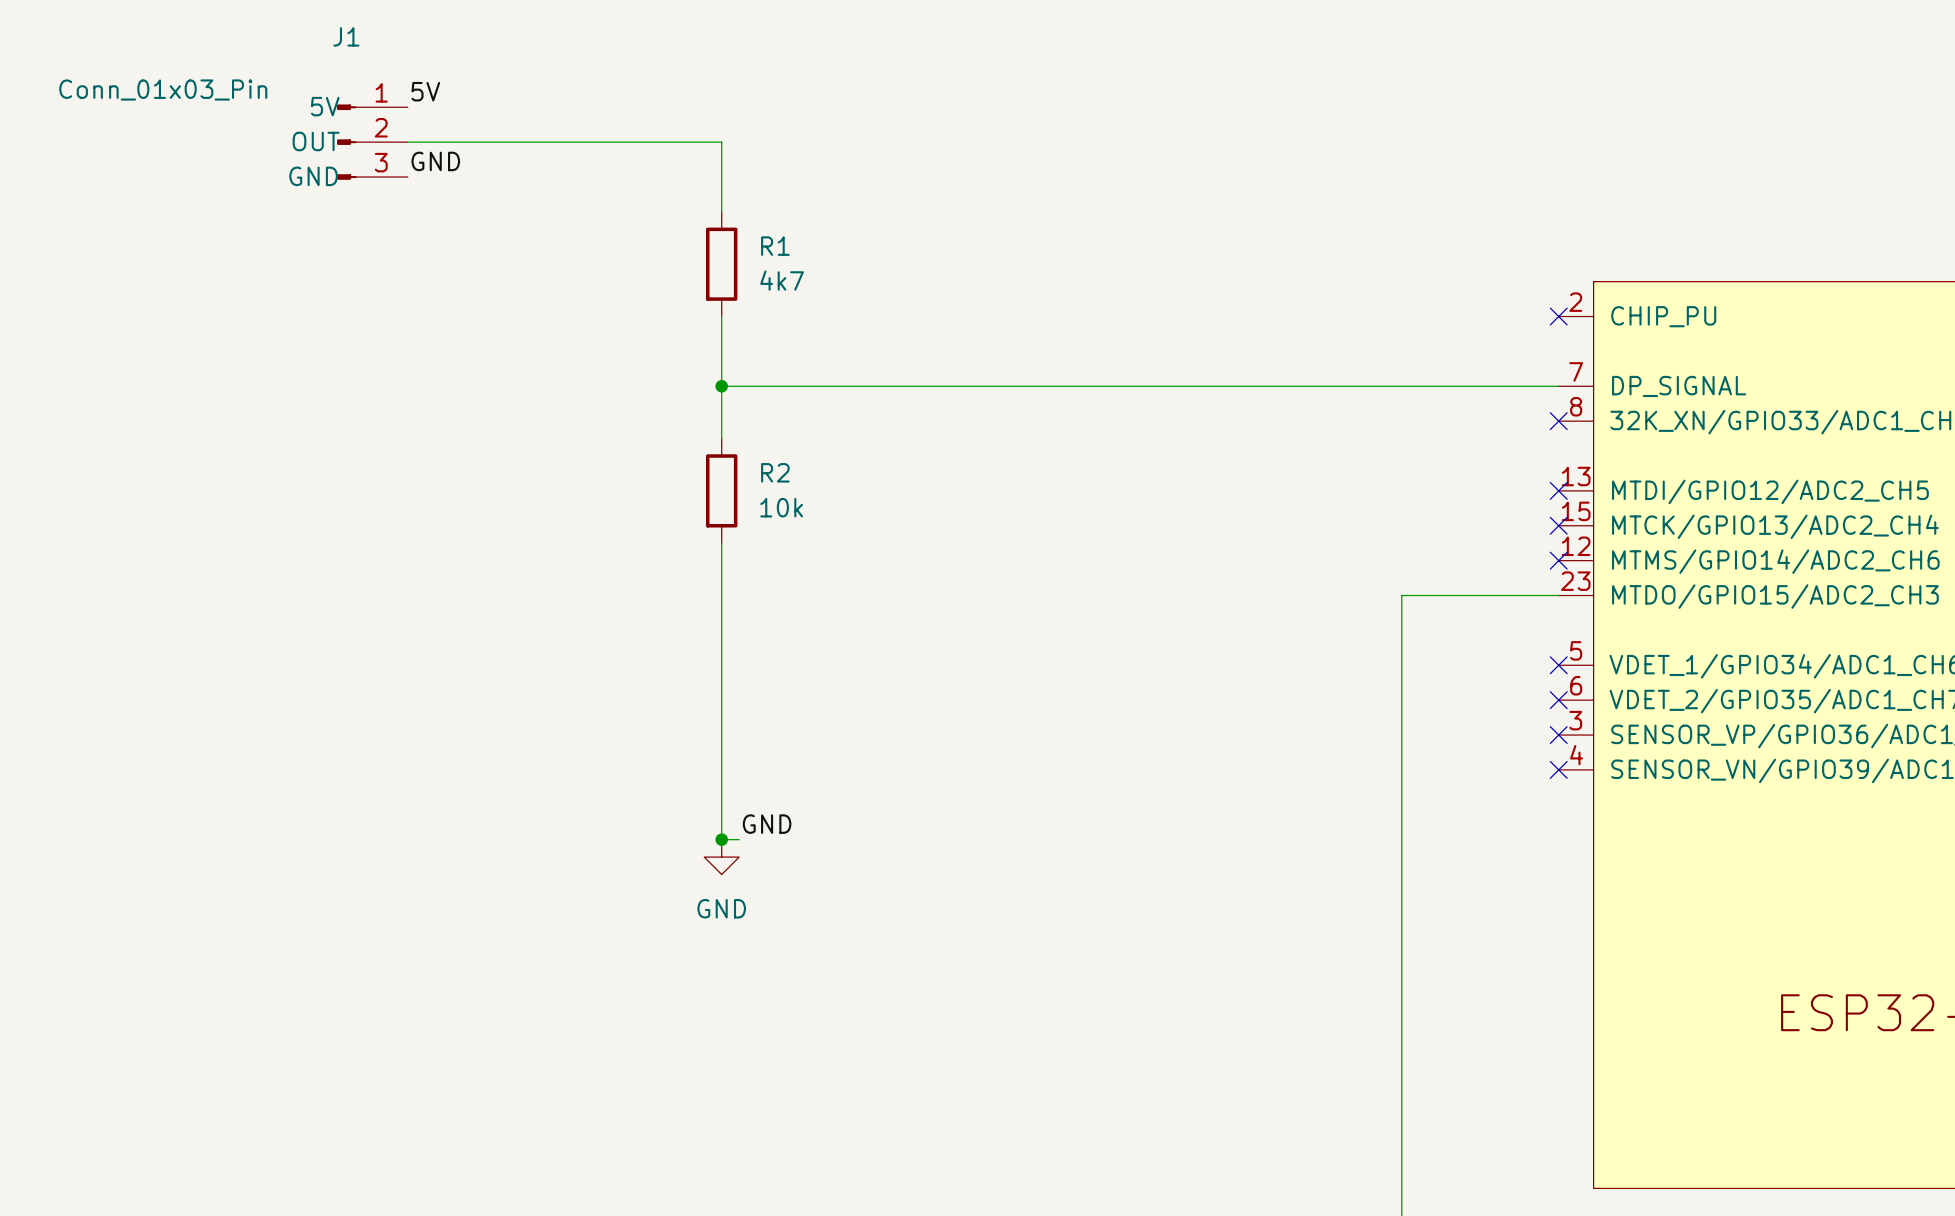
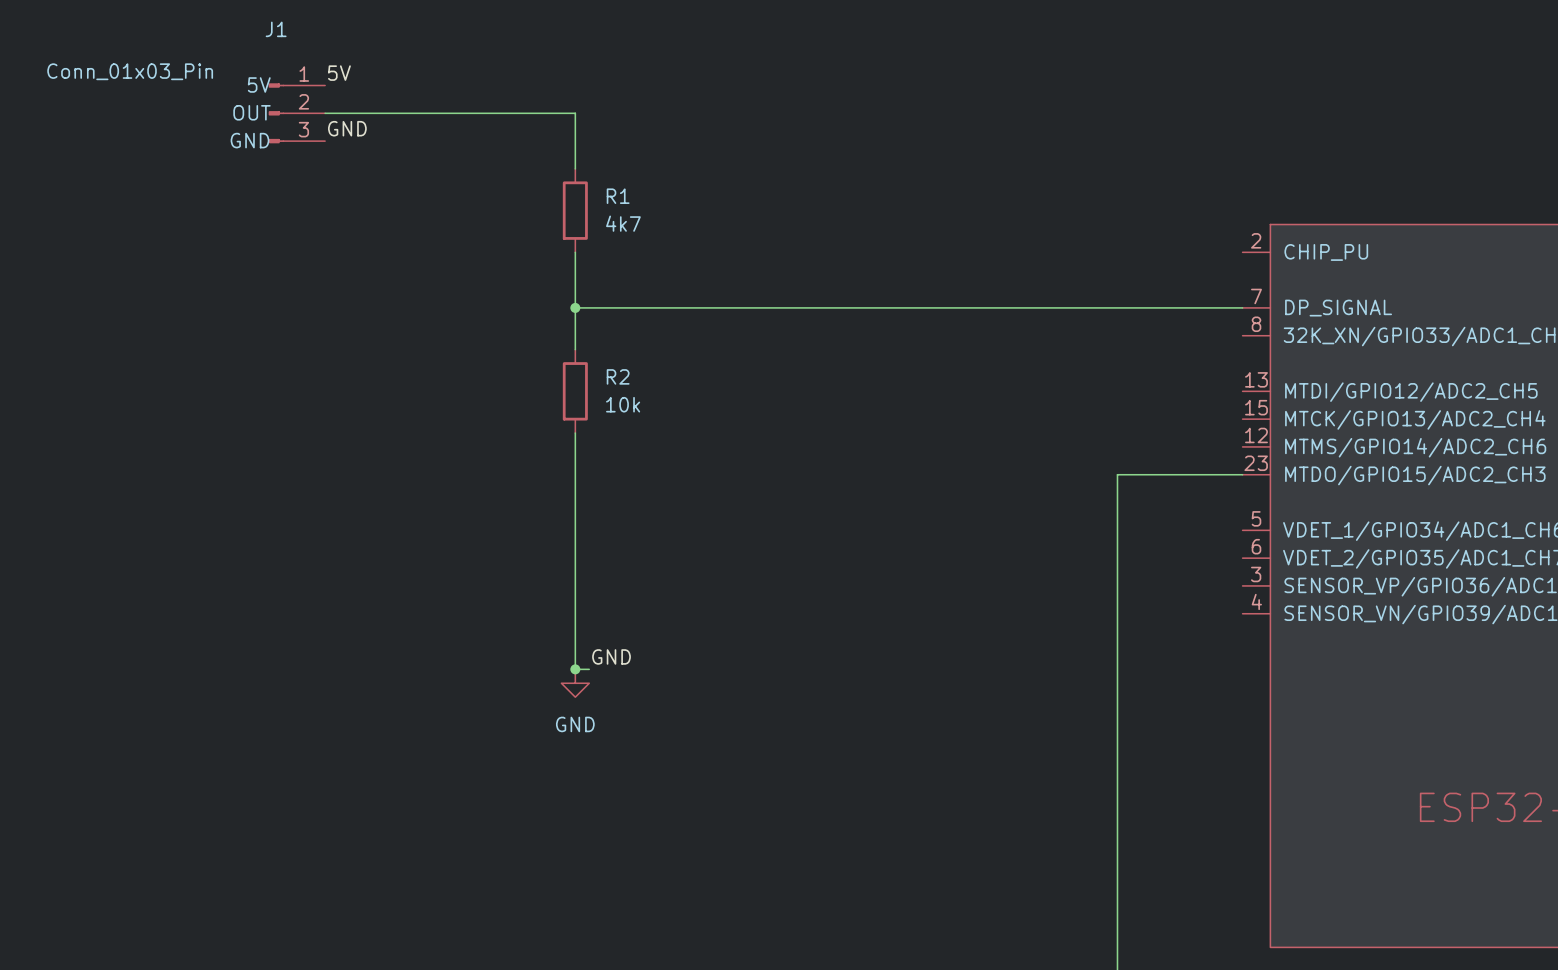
no-connect mark: (1558, 316) -> none
no-connect mark: (1558, 421) -> none
no-connect mark: (1558, 490) -> none
no-connect mark: (1558, 525) -> none
no-connect mark: (1558, 560) -> none
no-connect mark: (1558, 665) -> none
no-connect mark: (1558, 700) -> none
no-connect mark: (1558, 735) -> none
no-connect mark: (1558, 769) -> none

